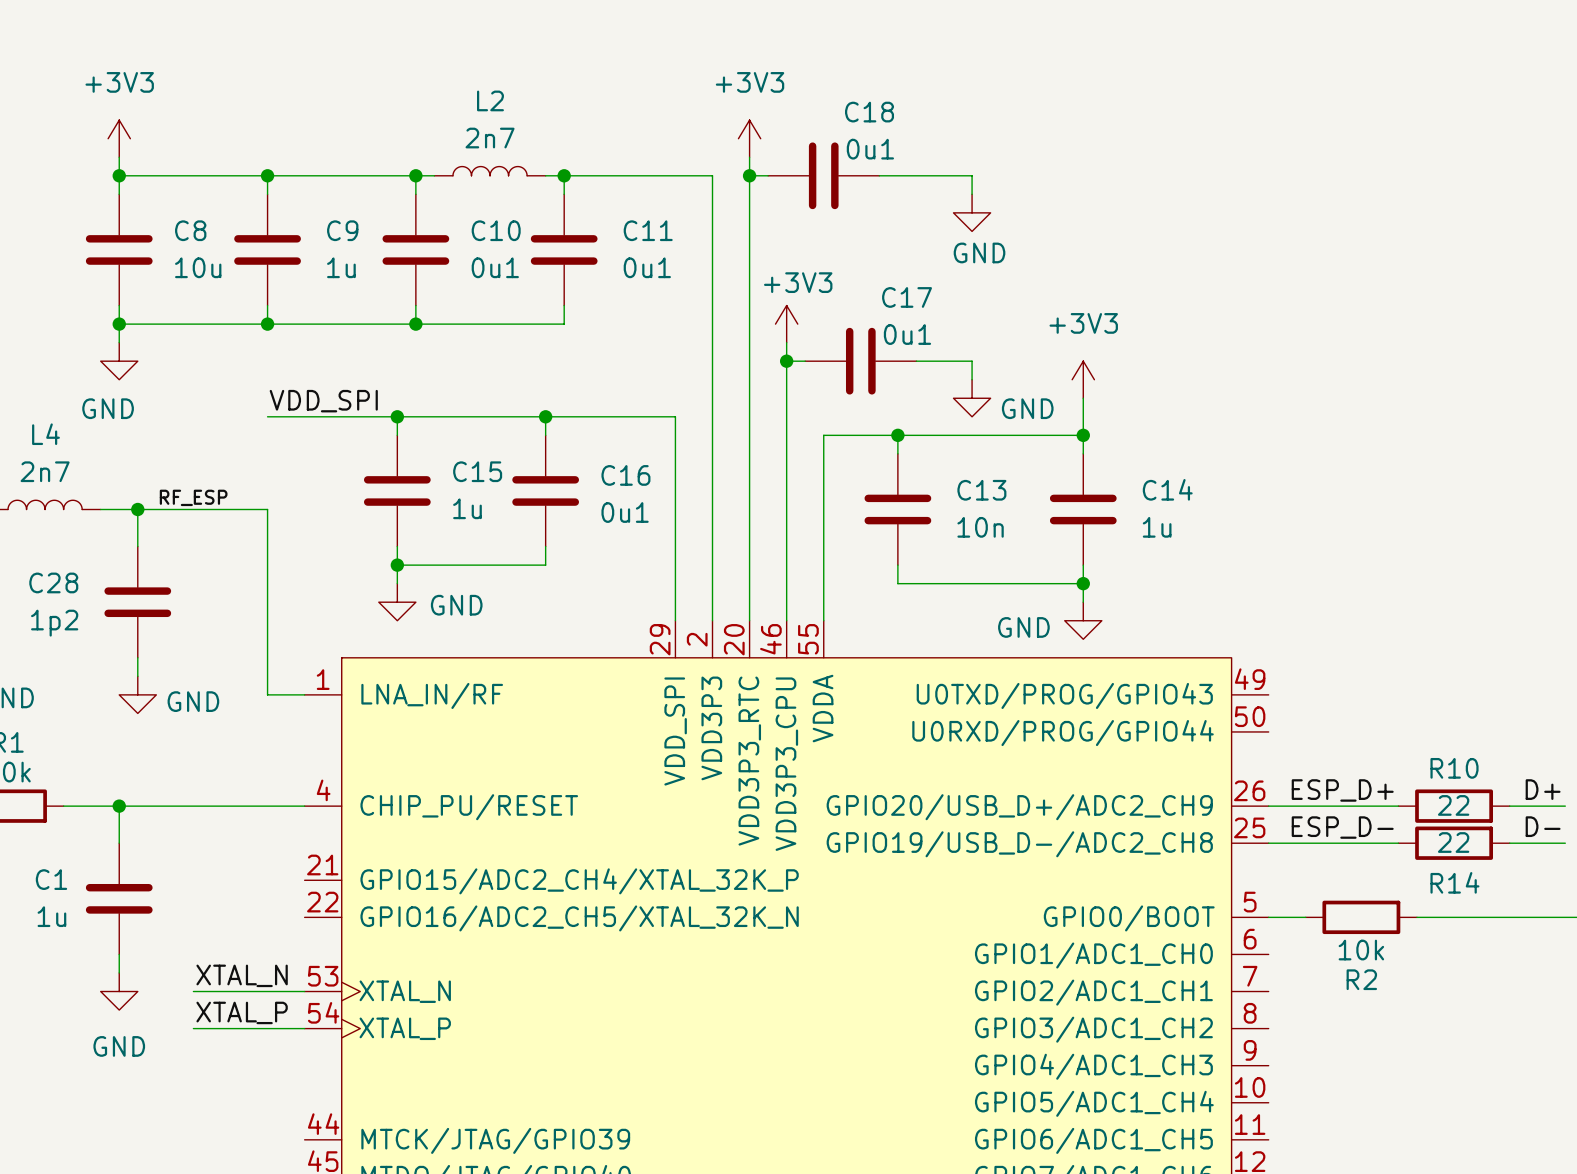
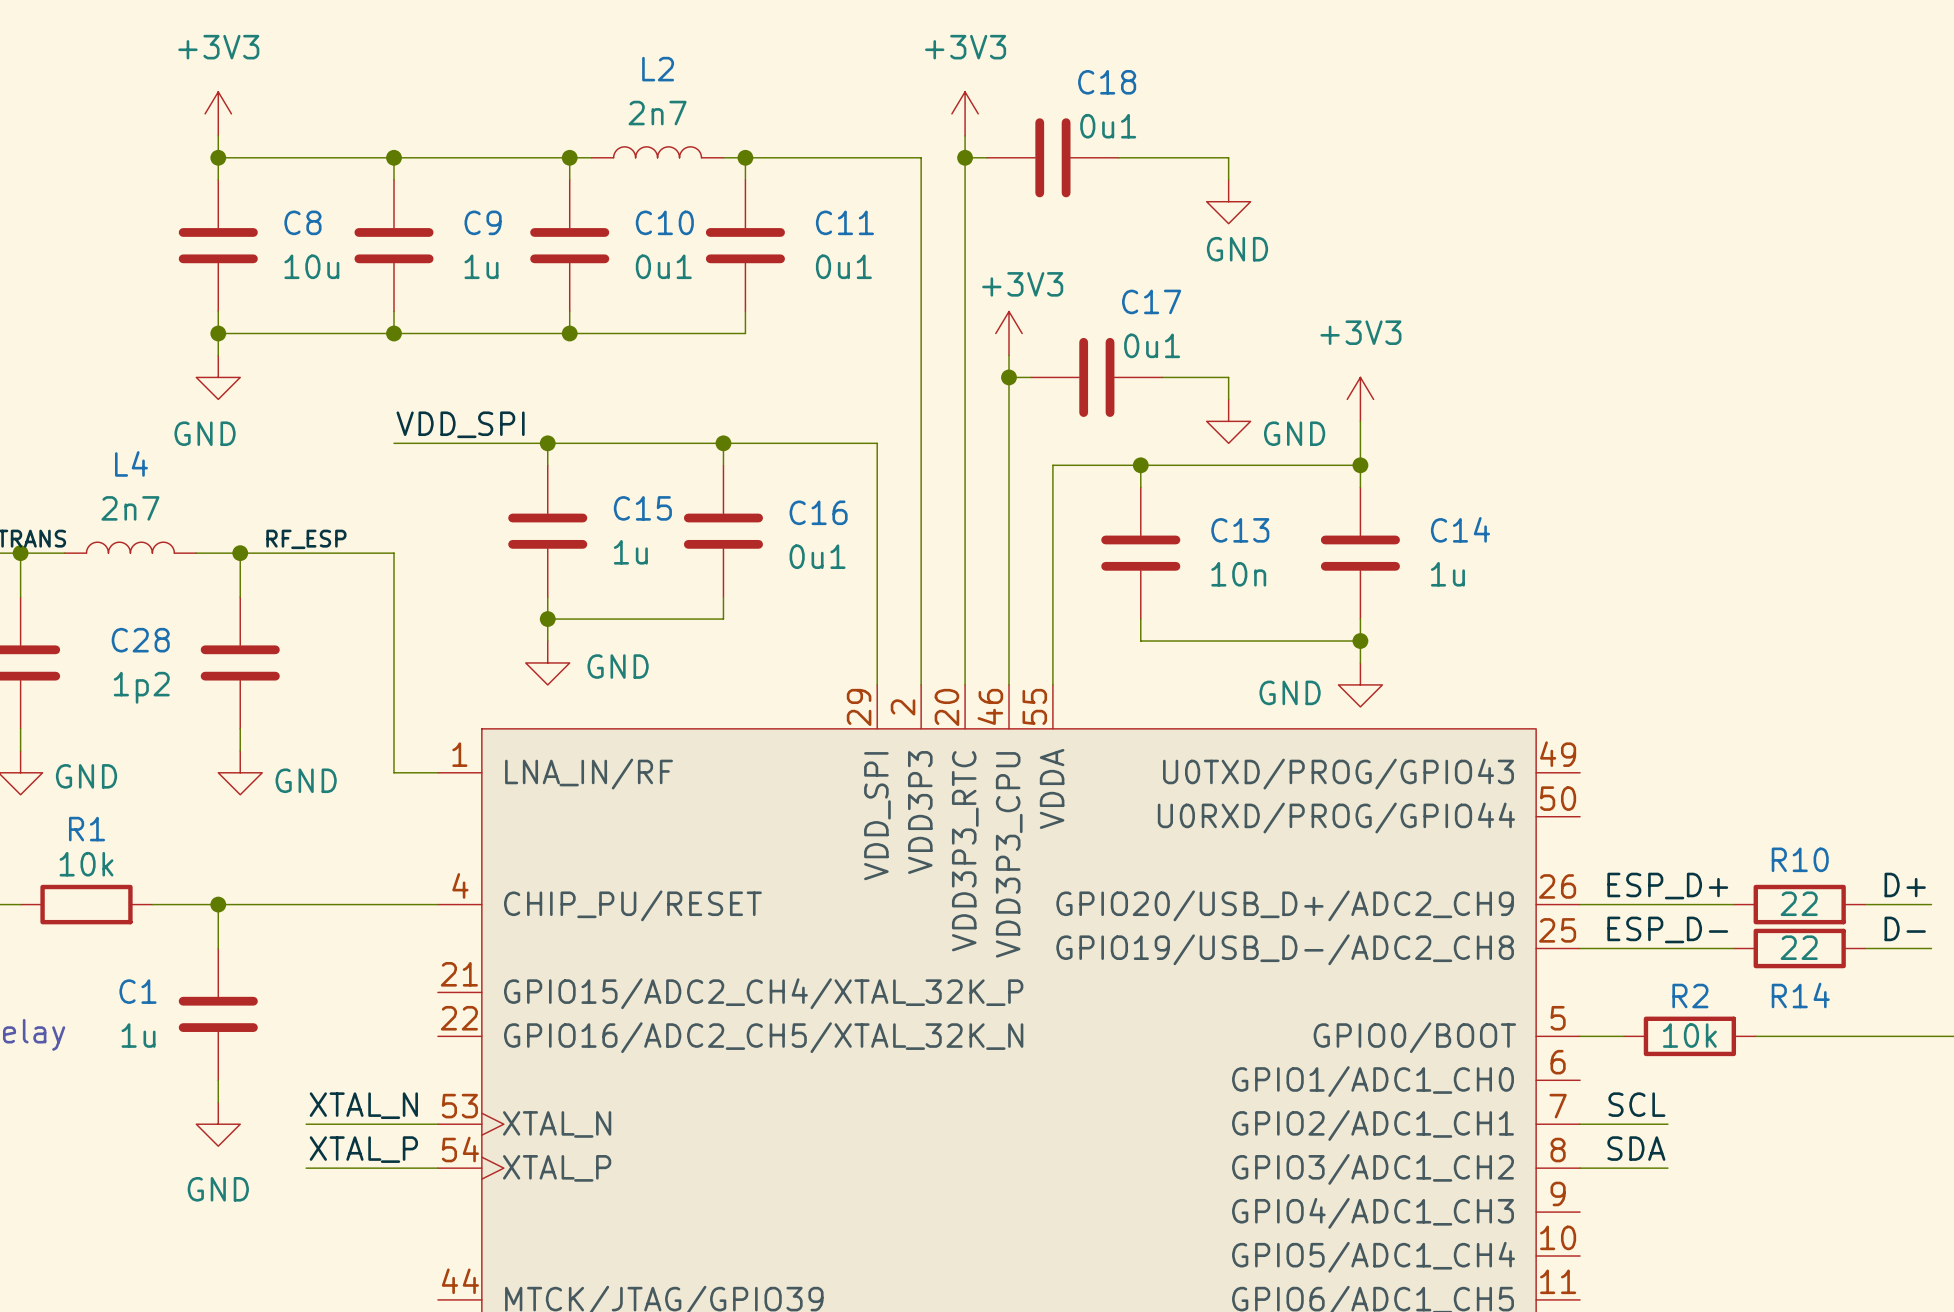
R2 value position: 10k (1361, 950) -> 10k (1689, 1035)
label: none -> SCL (1636, 1104)
R2 name position: R2 (1361, 979) -> R2 (1690, 996)
wire: none -> (1580, 1124) (1667, 1124)
label: none -> SDA (1636, 1148)
wire: none -> (1580, 1168) (1667, 1168)

